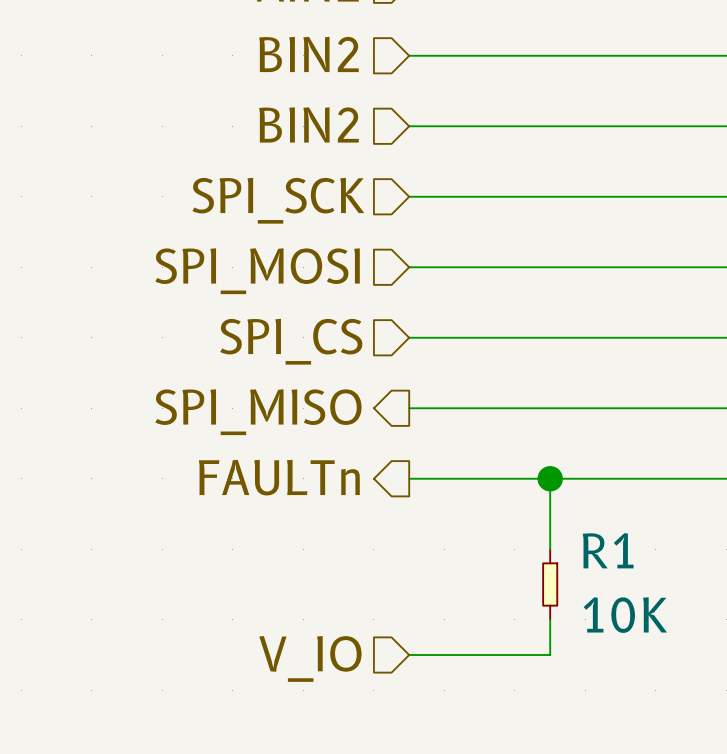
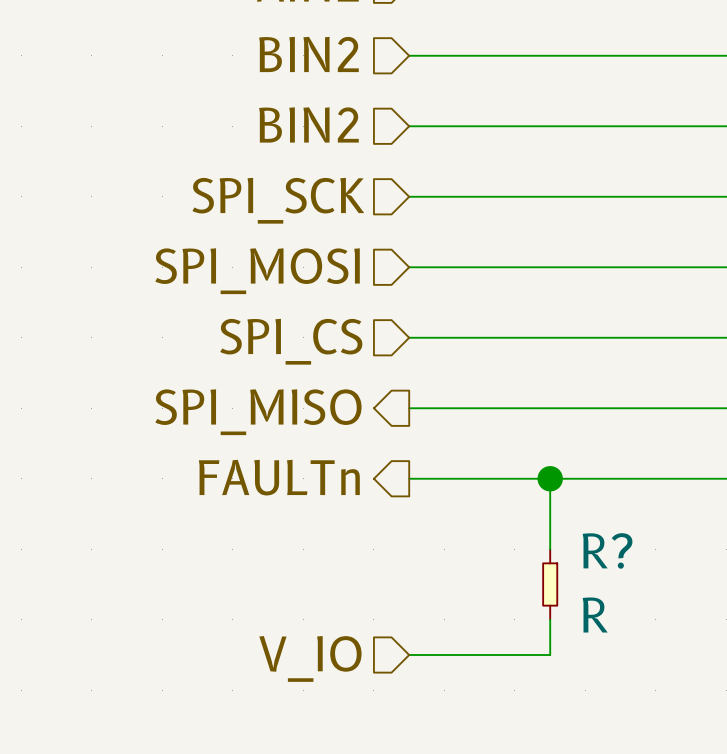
R1 name: R1 (608, 550) -> R? (607, 550)
R1 value: 10K (625, 615) -> R (595, 615)

